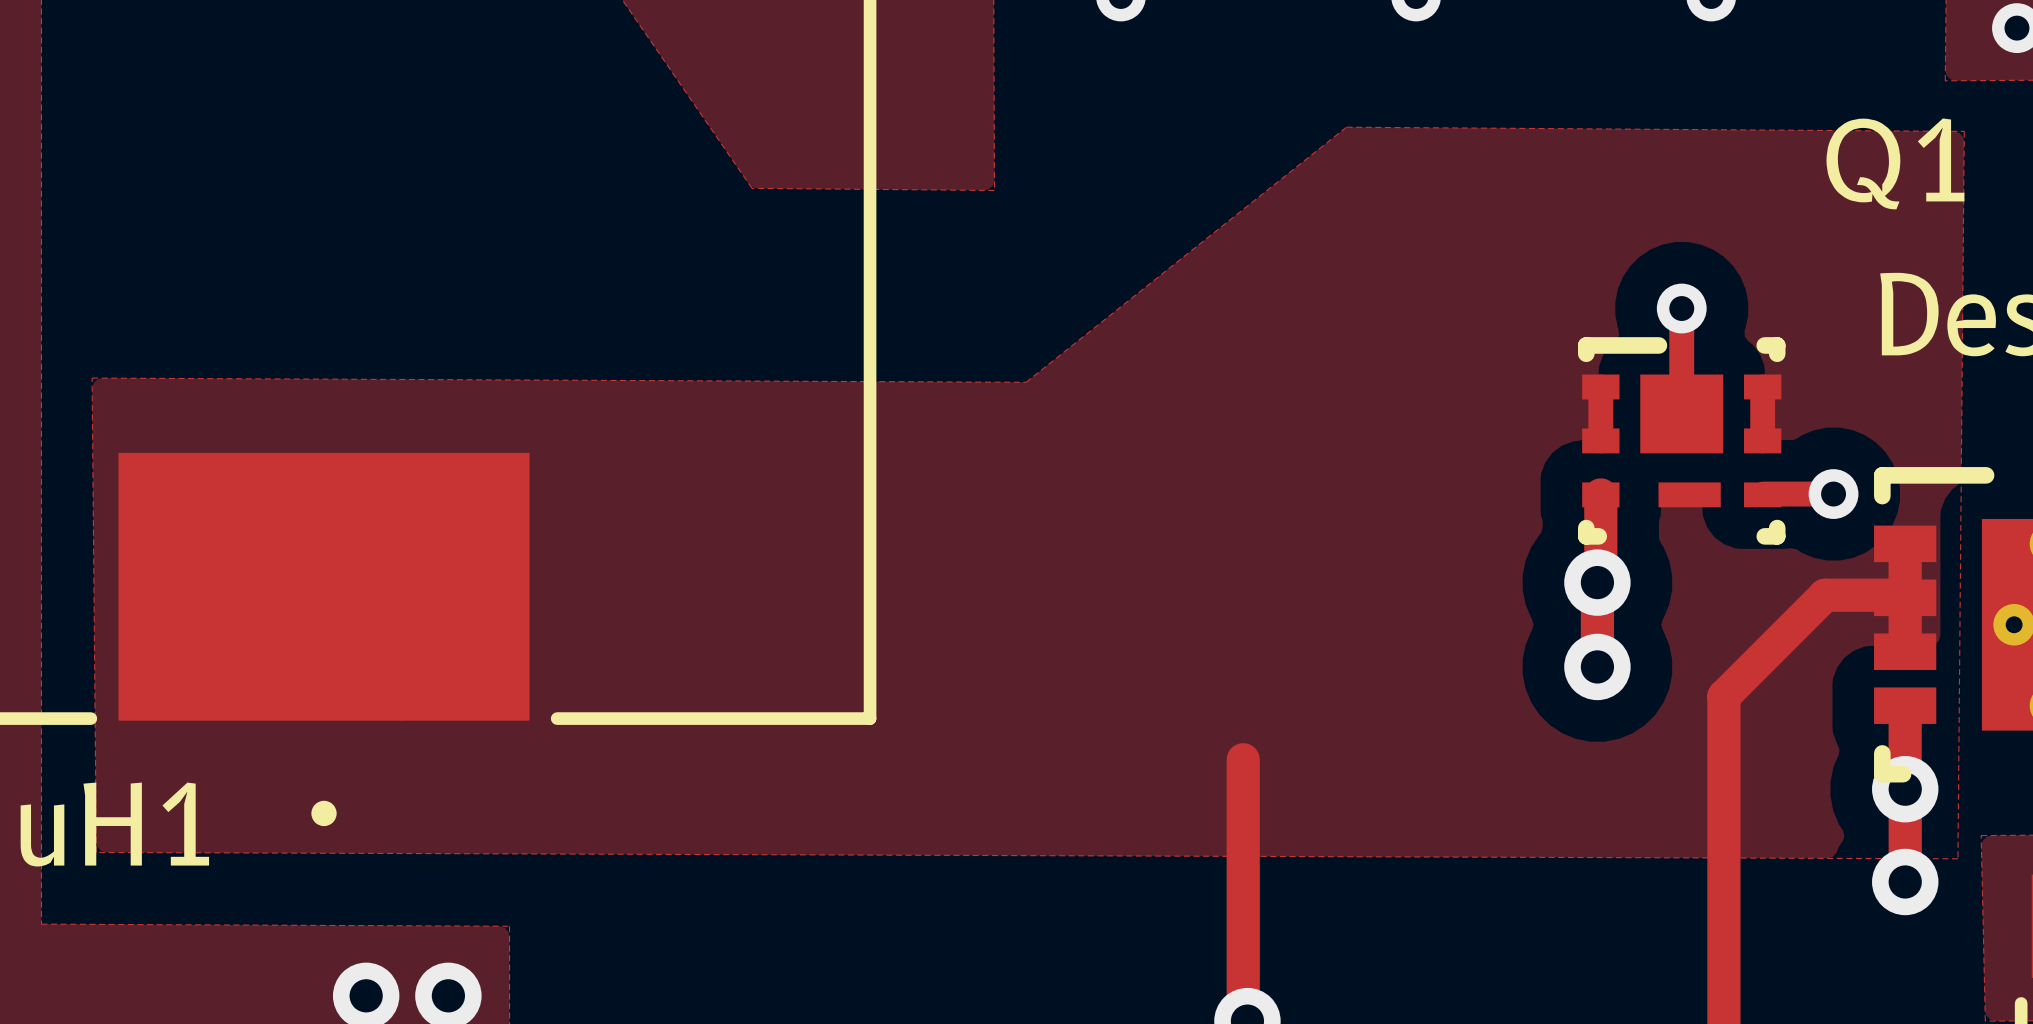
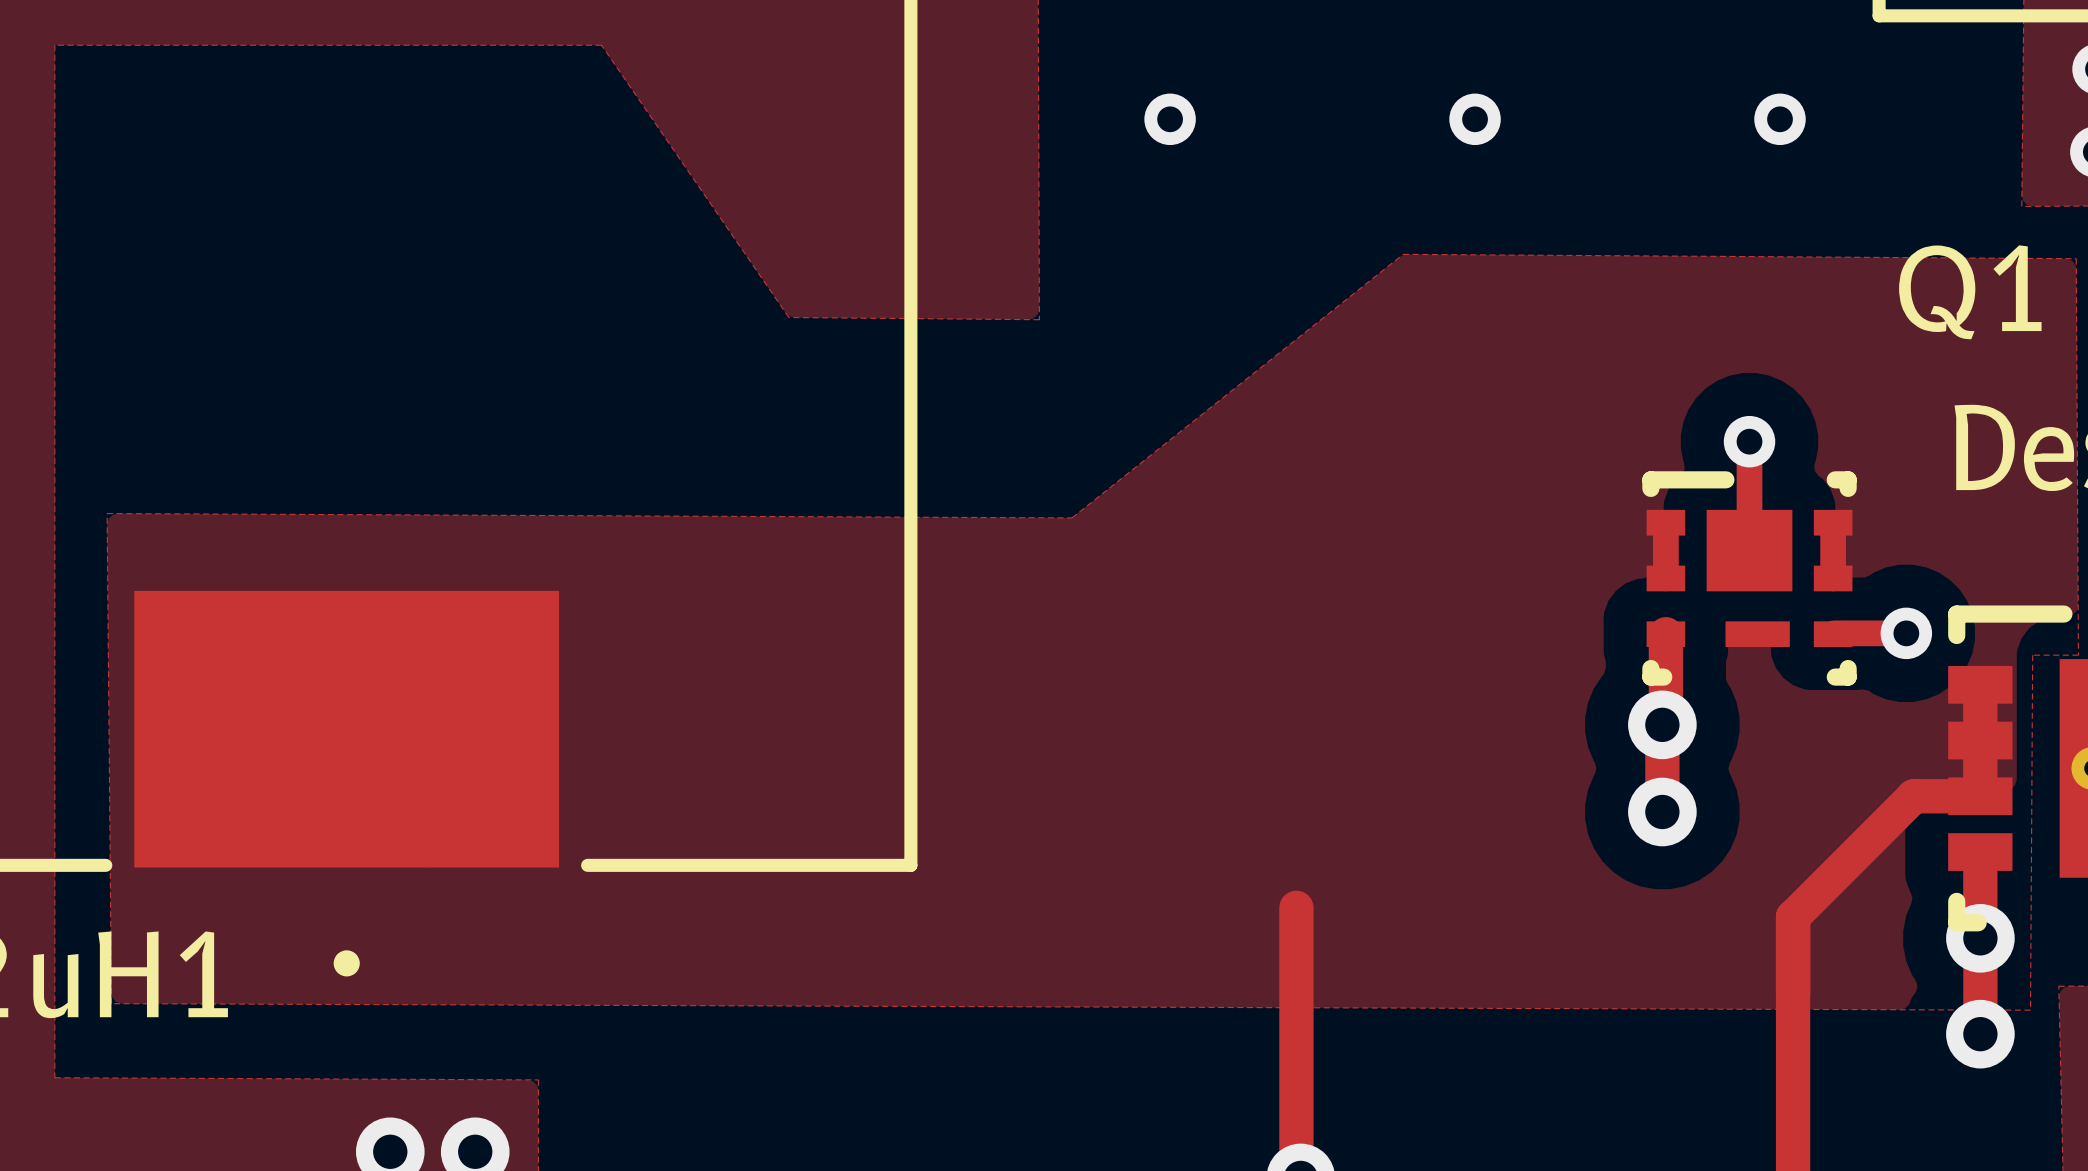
zone outline: (1346, 127) (1964, 131) (1957, 858) (96, 852) -> (1403, 254) (2076, 258) (2078, 655) (2032, 655) (2030, 1010) (111, 1003)
track: (1902, 595) (1825, 595) (1723, 696) (1723, 768) -> (1980, 796) (1913, 796) (1793, 917)

